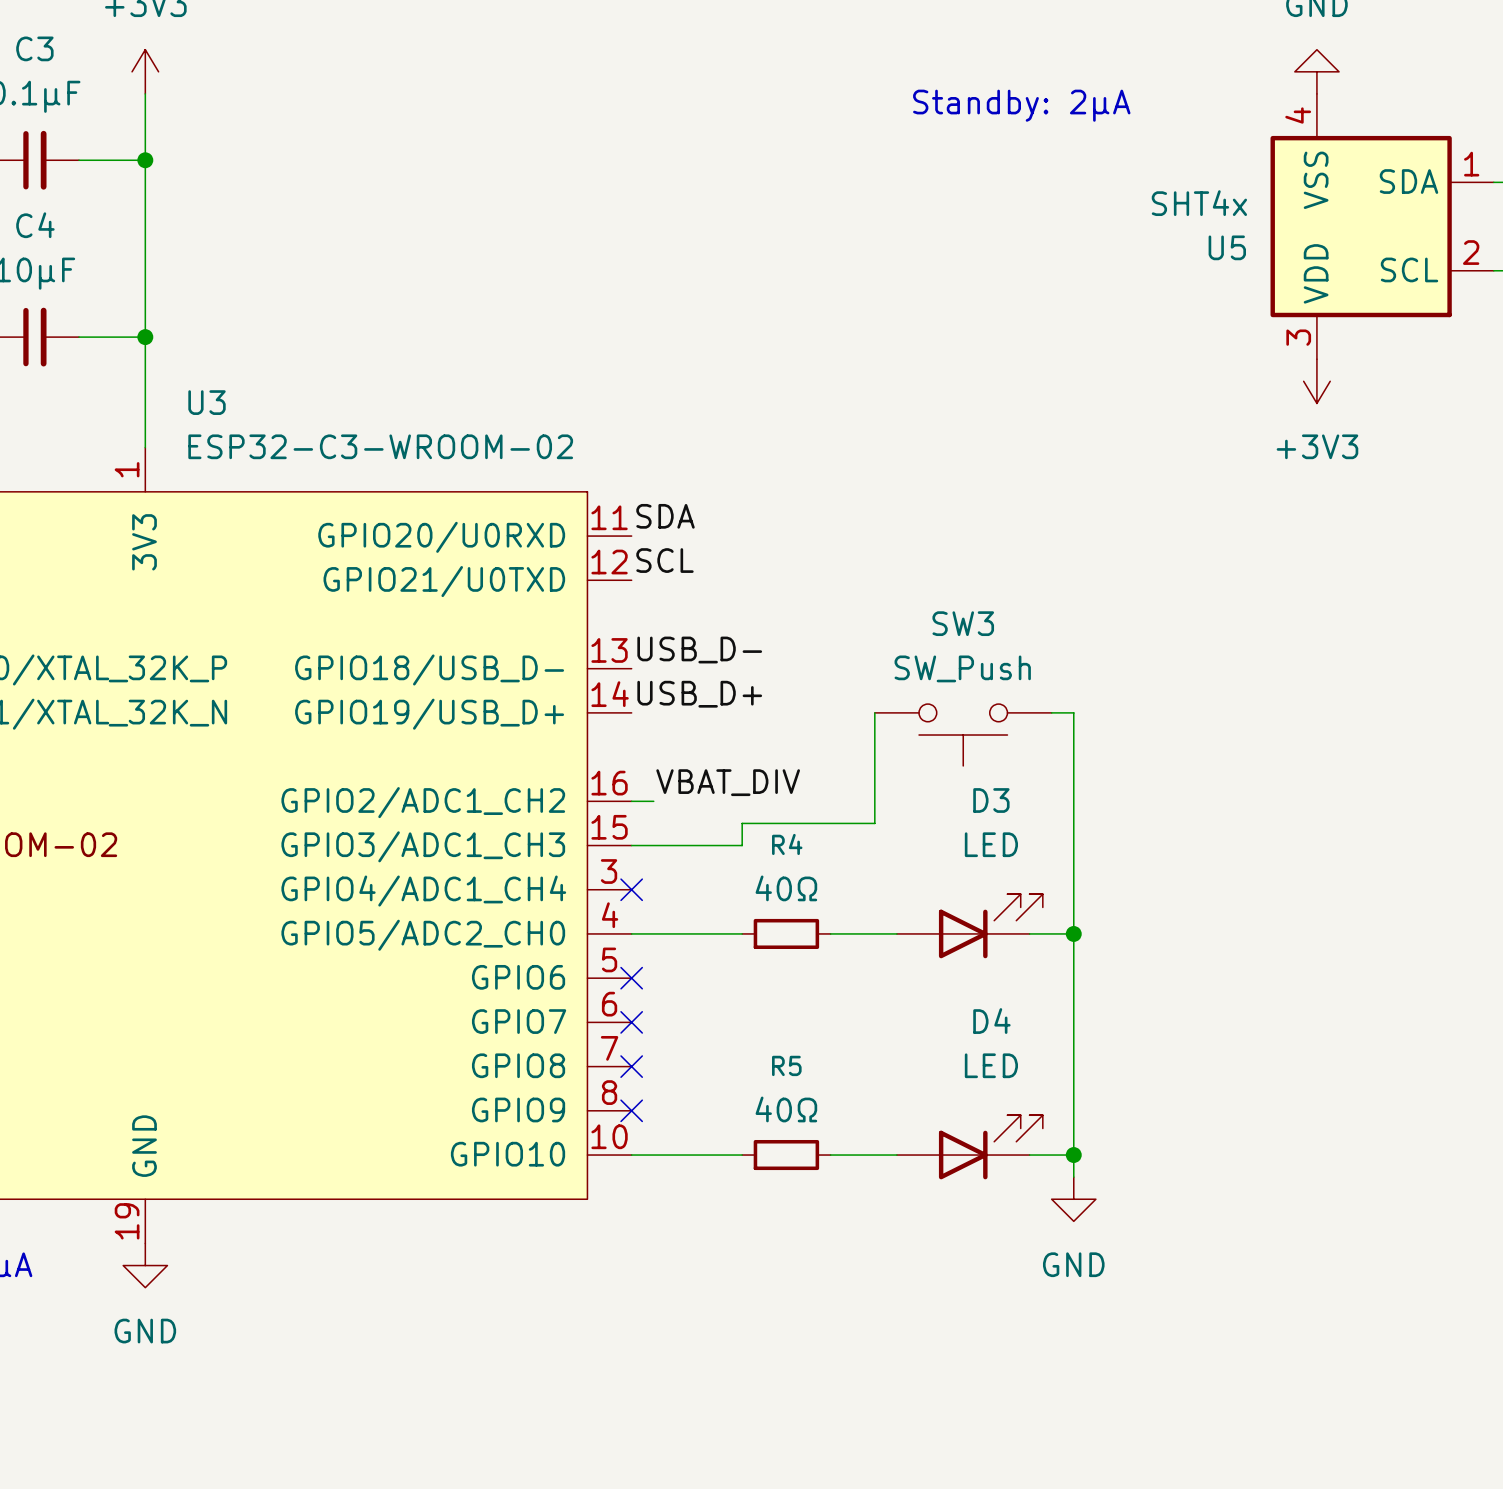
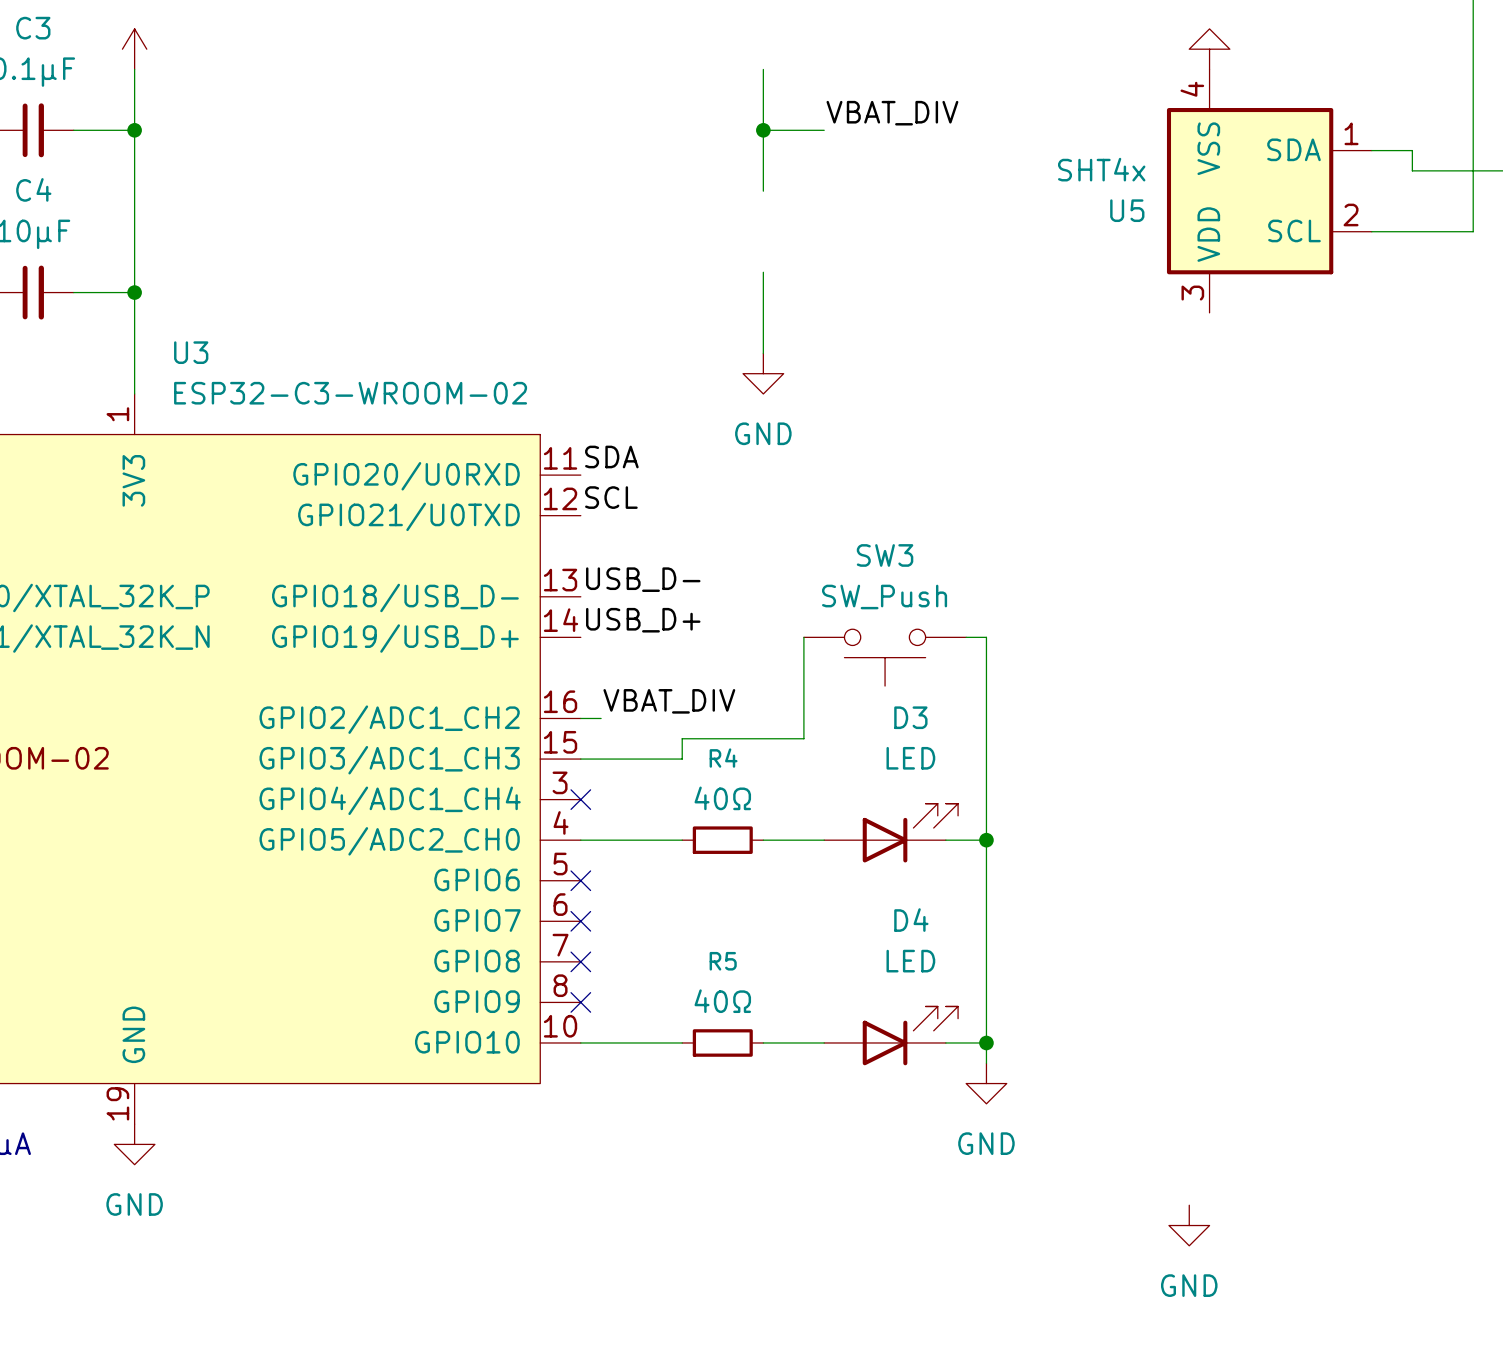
wire: none -> (763, 69) (763, 191)
text: Standby: 2µA (1021, 105) -> none
label: none -> VBAT_DIV (892, 113)
wire: none -> (763, 130) (824, 130)
junction: none -> (763, 130)
wire: none -> (763, 272) (763, 353)
power symbol: +3V3 (1316, 381) -> none
power symbol: none -> GND (763, 373)
power symbol: none -> GND (1189, 1225)

